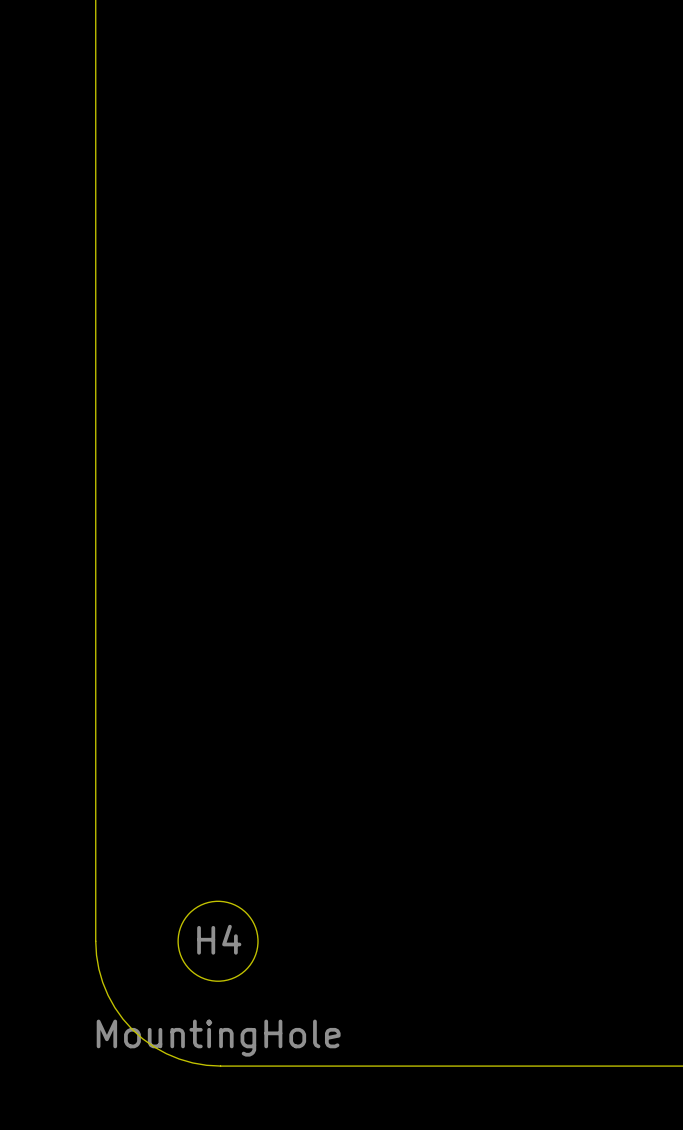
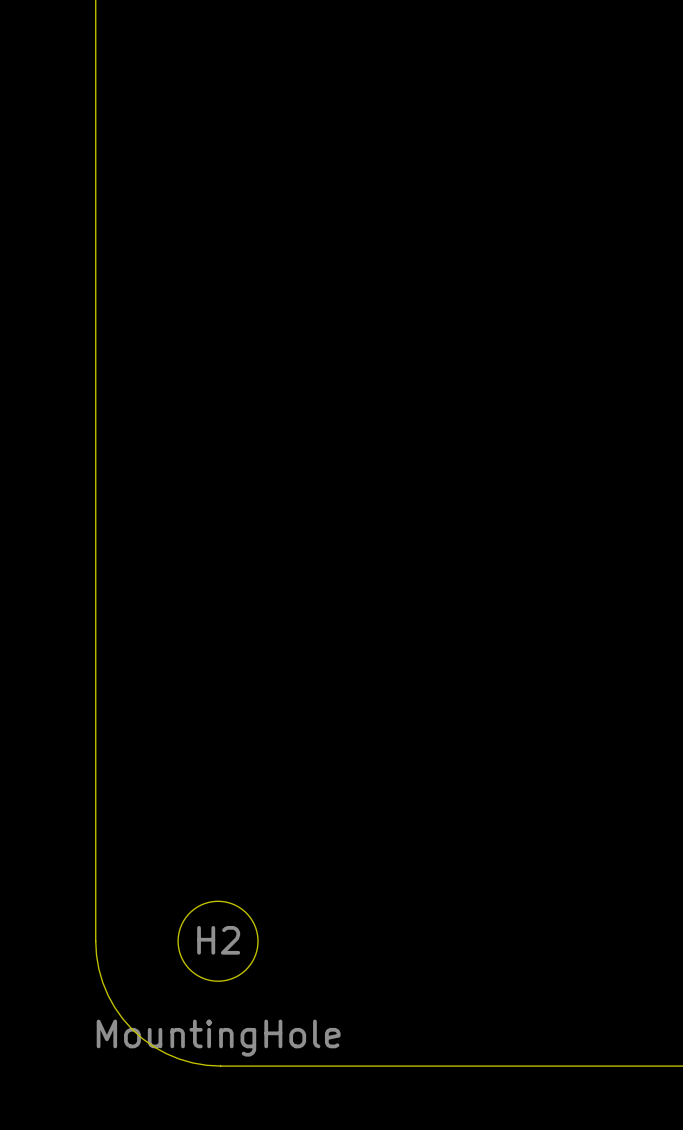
H4 name: H4 (219, 939) -> H2 (218, 940)

